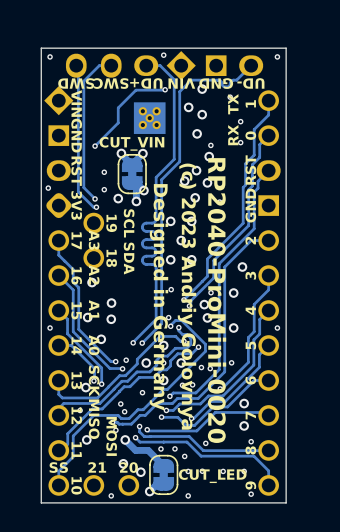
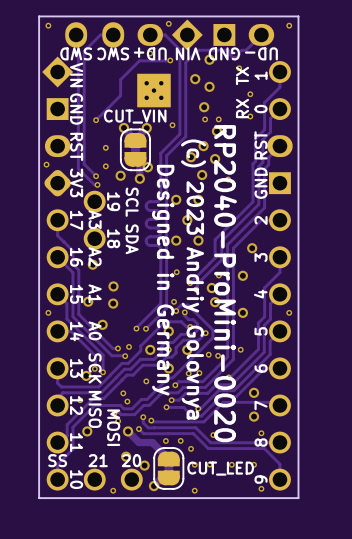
via: none -> (150, 53)
via: none -> (205, 119)
via: none -> (172, 125)

